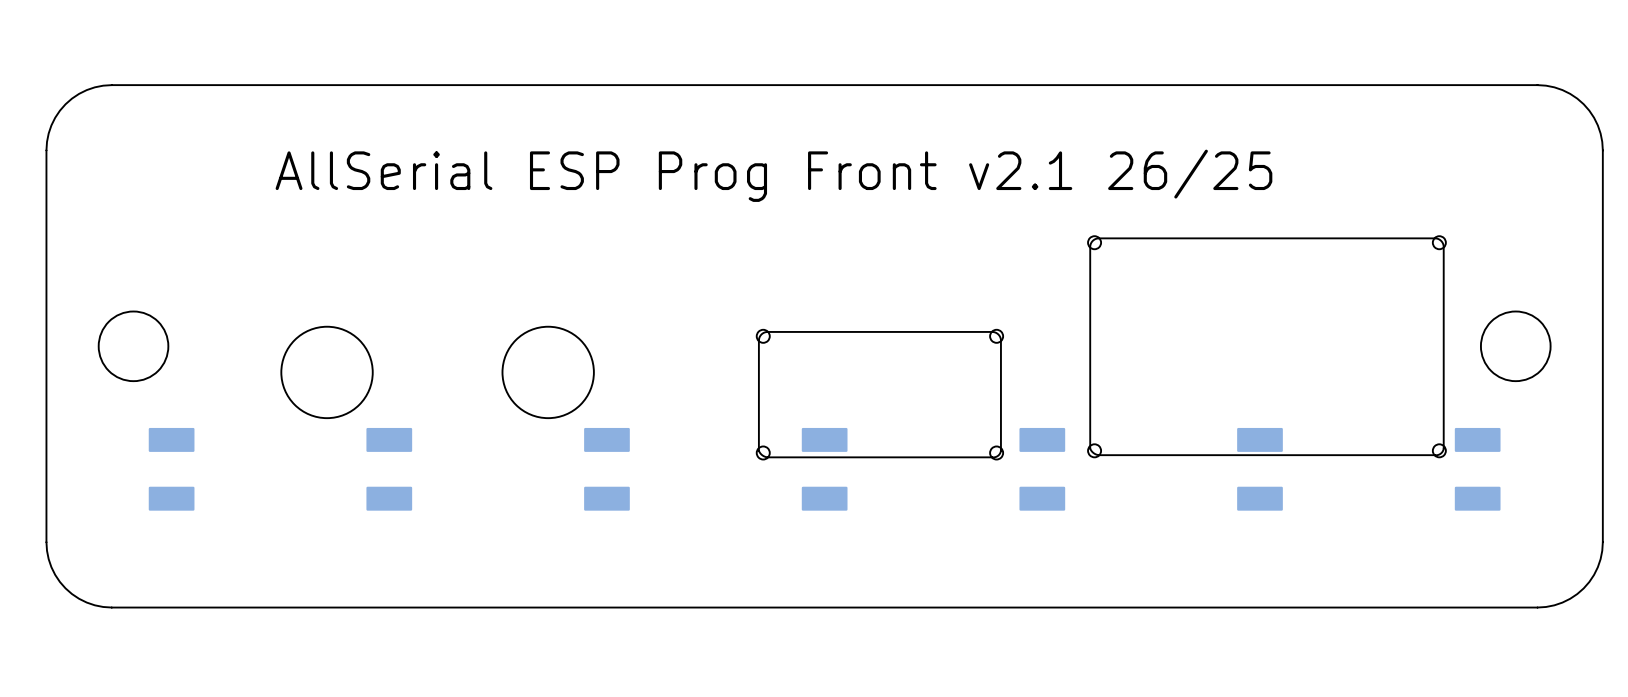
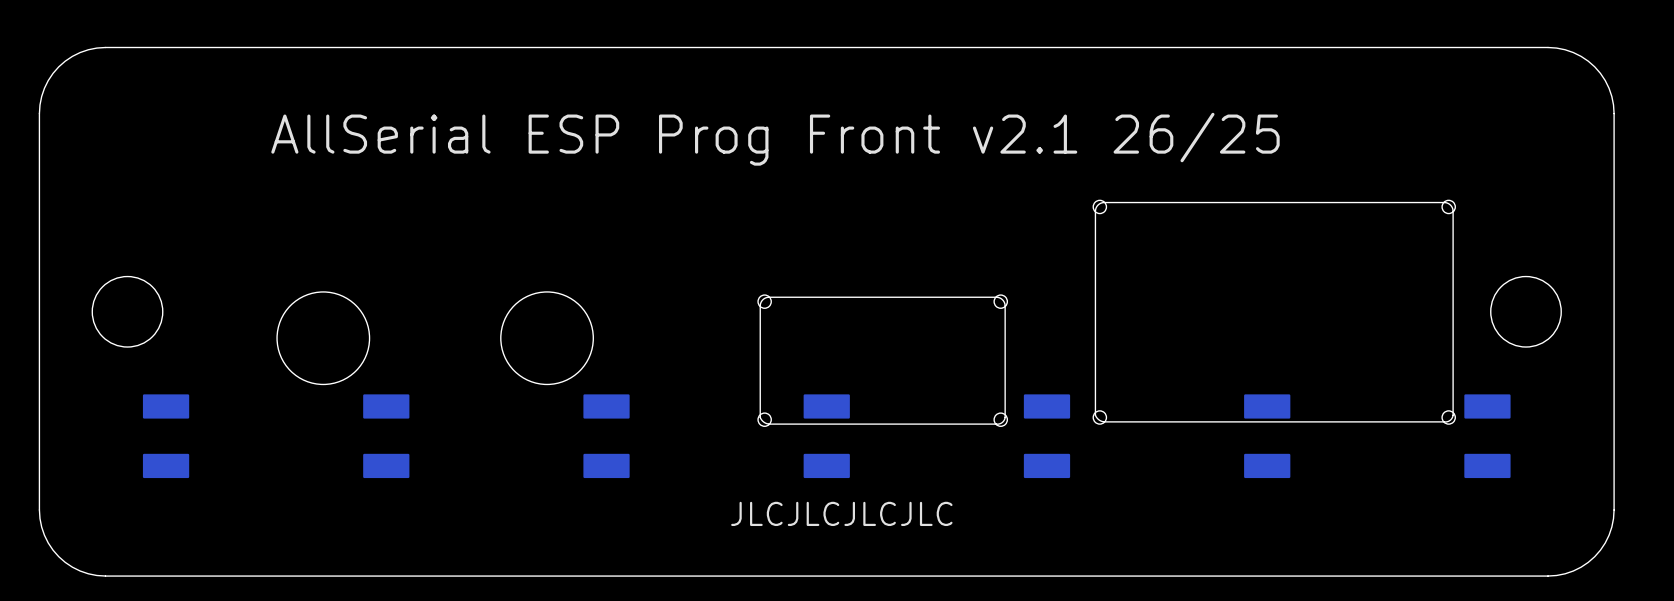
text: none -> JLCJLCJLCJLC (841, 513)

